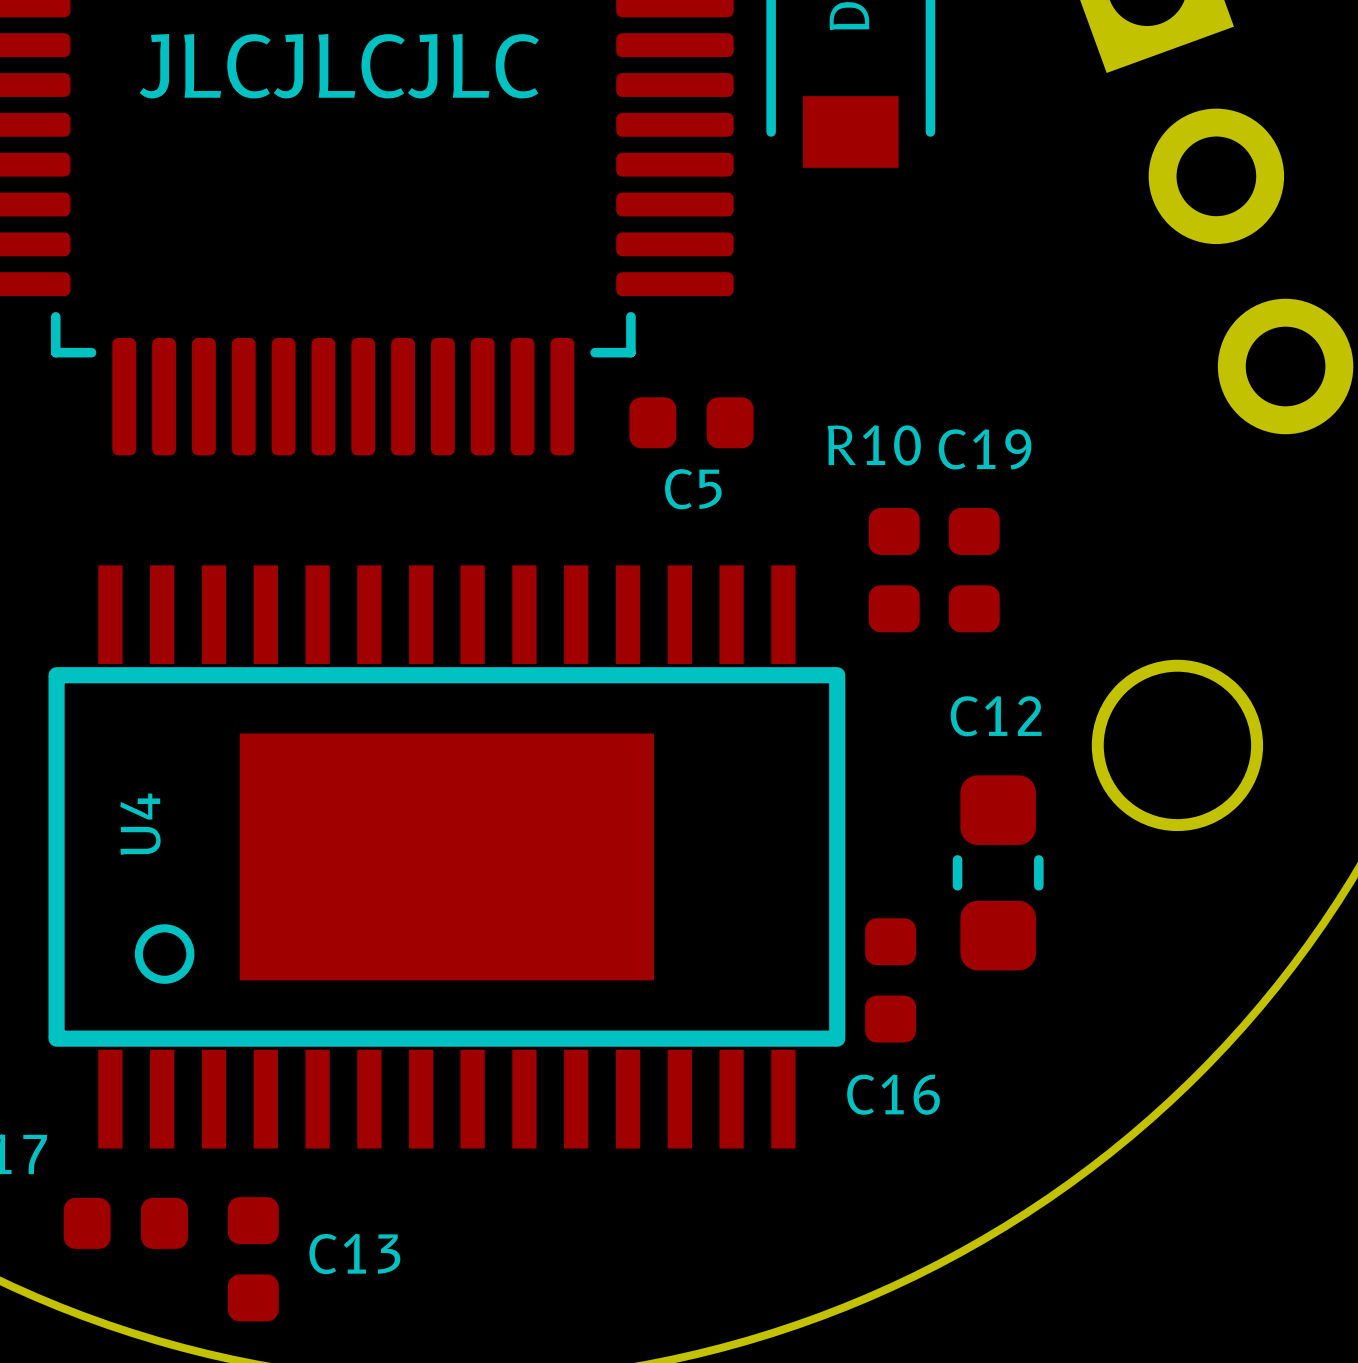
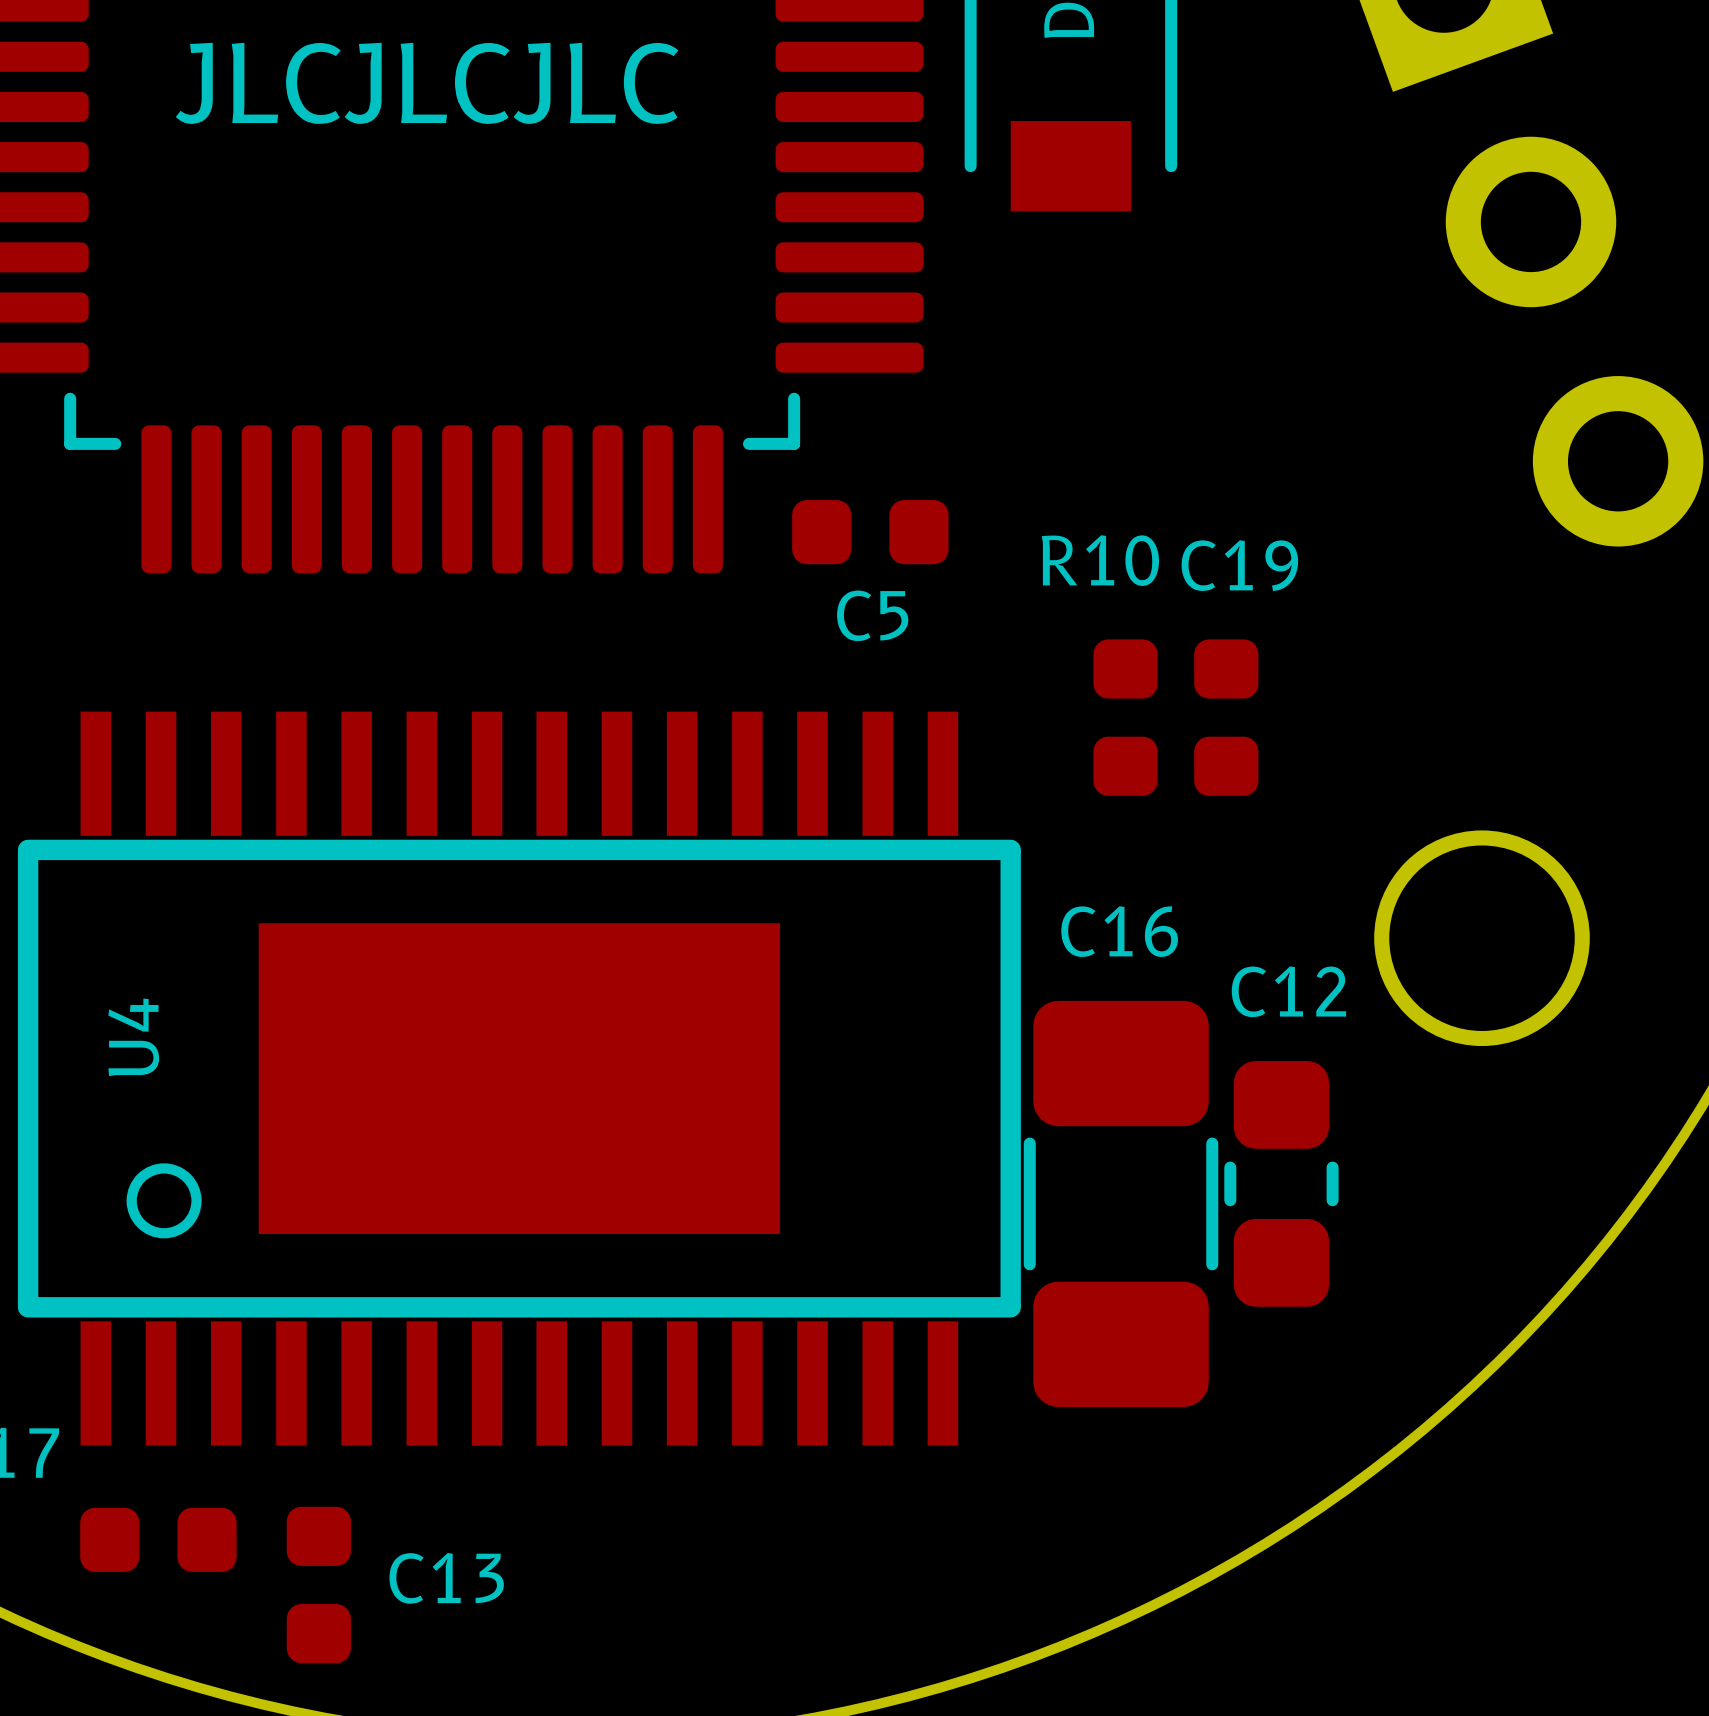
C12 name position: C12 (996, 716) -> C12 (1288, 991)
U4 position: (446, 856) -> (519, 1078)
C12 position: (998, 872) -> (1281, 1183)
C16 footprint: [865, 918, 917, 1043] -> [1023, 1000, 1219, 1407]
C16 name position: C16 (893, 1094) -> C16 (1119, 931)

